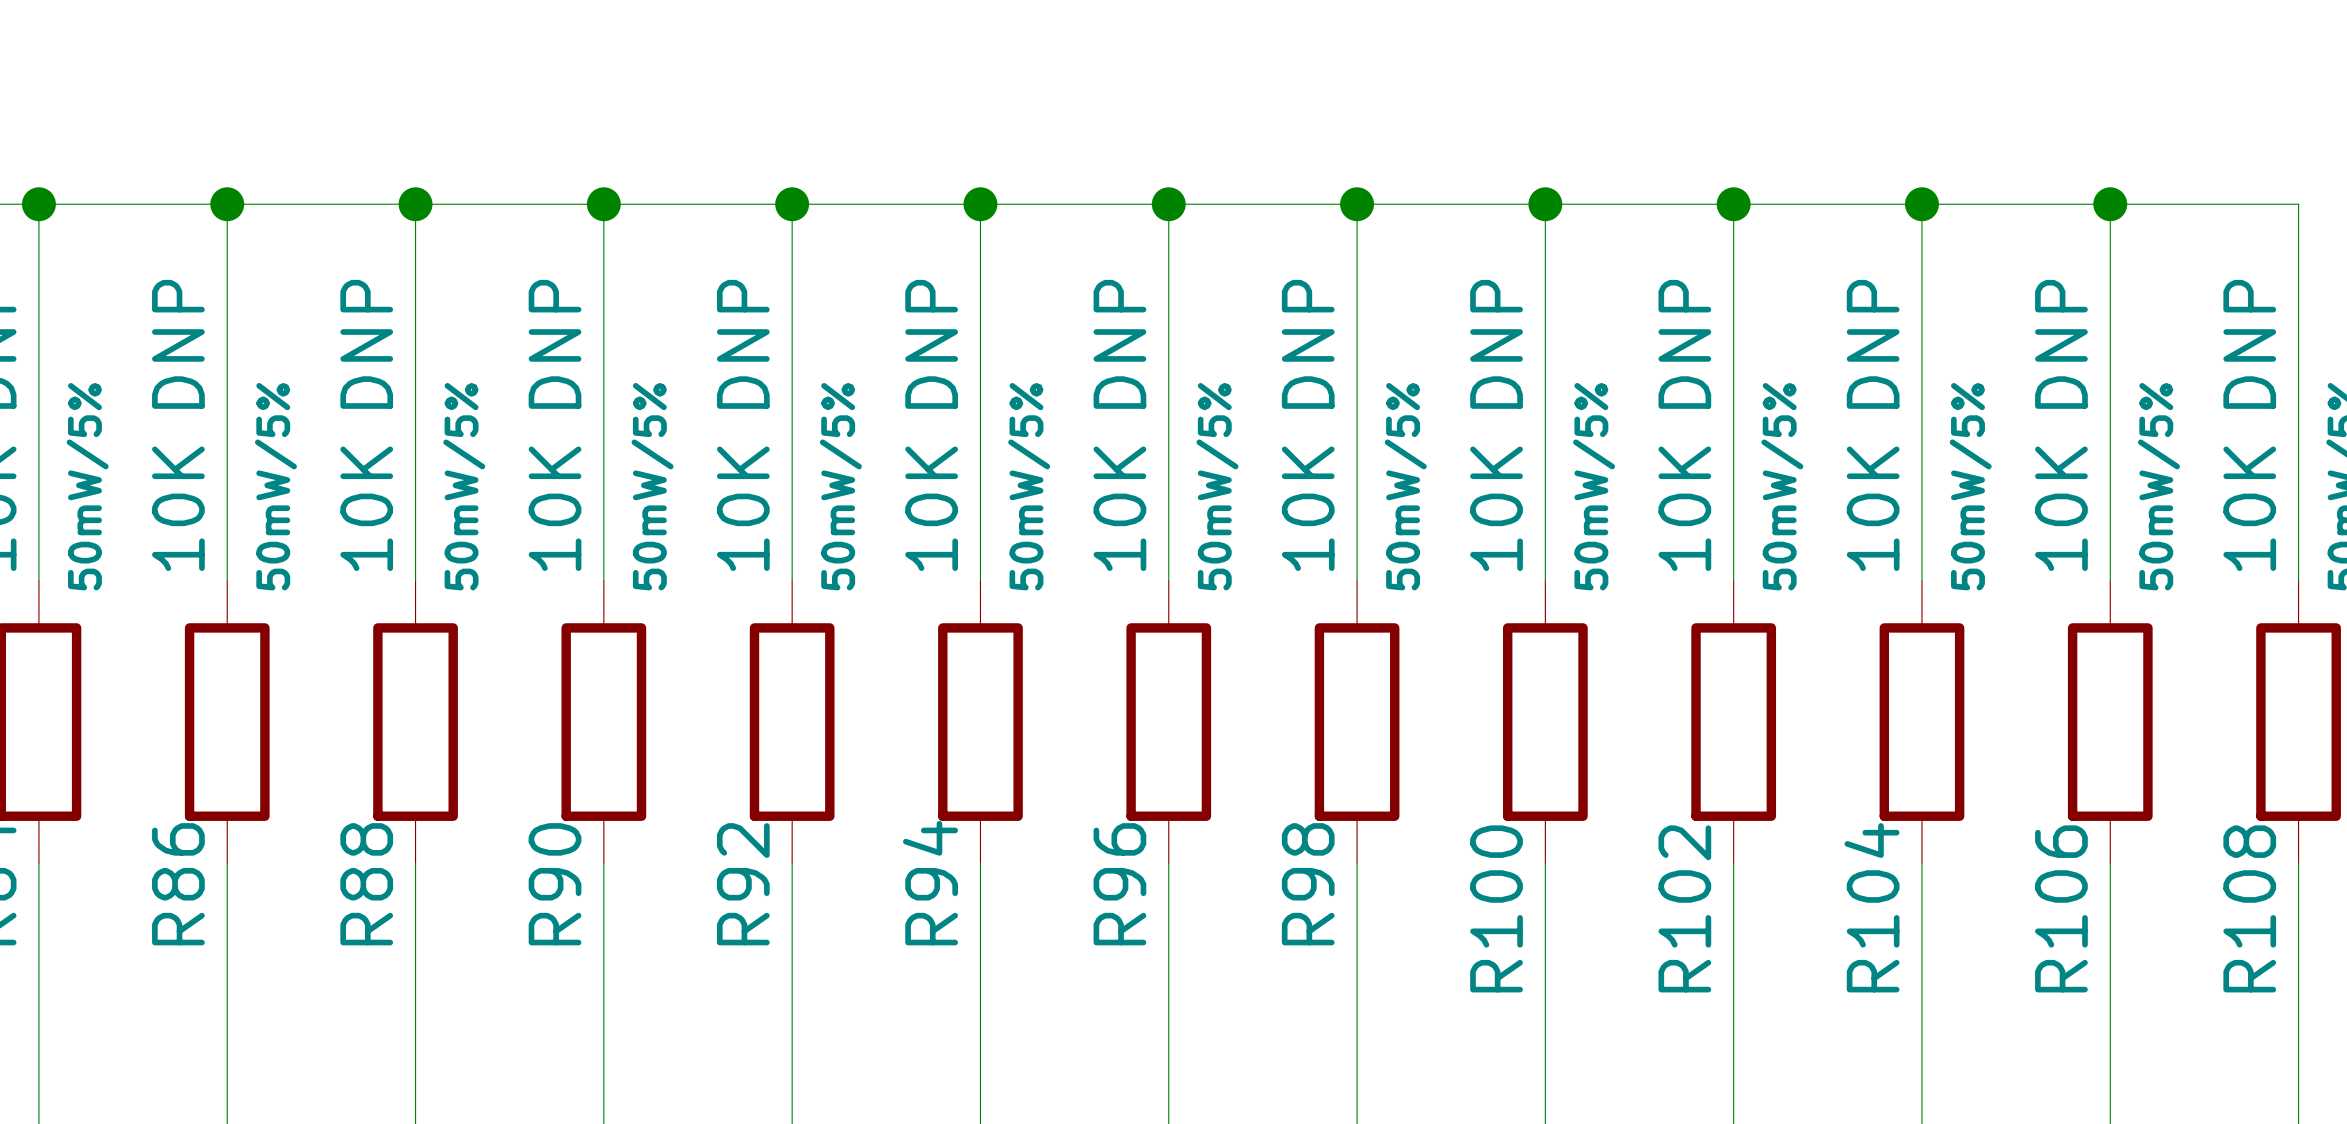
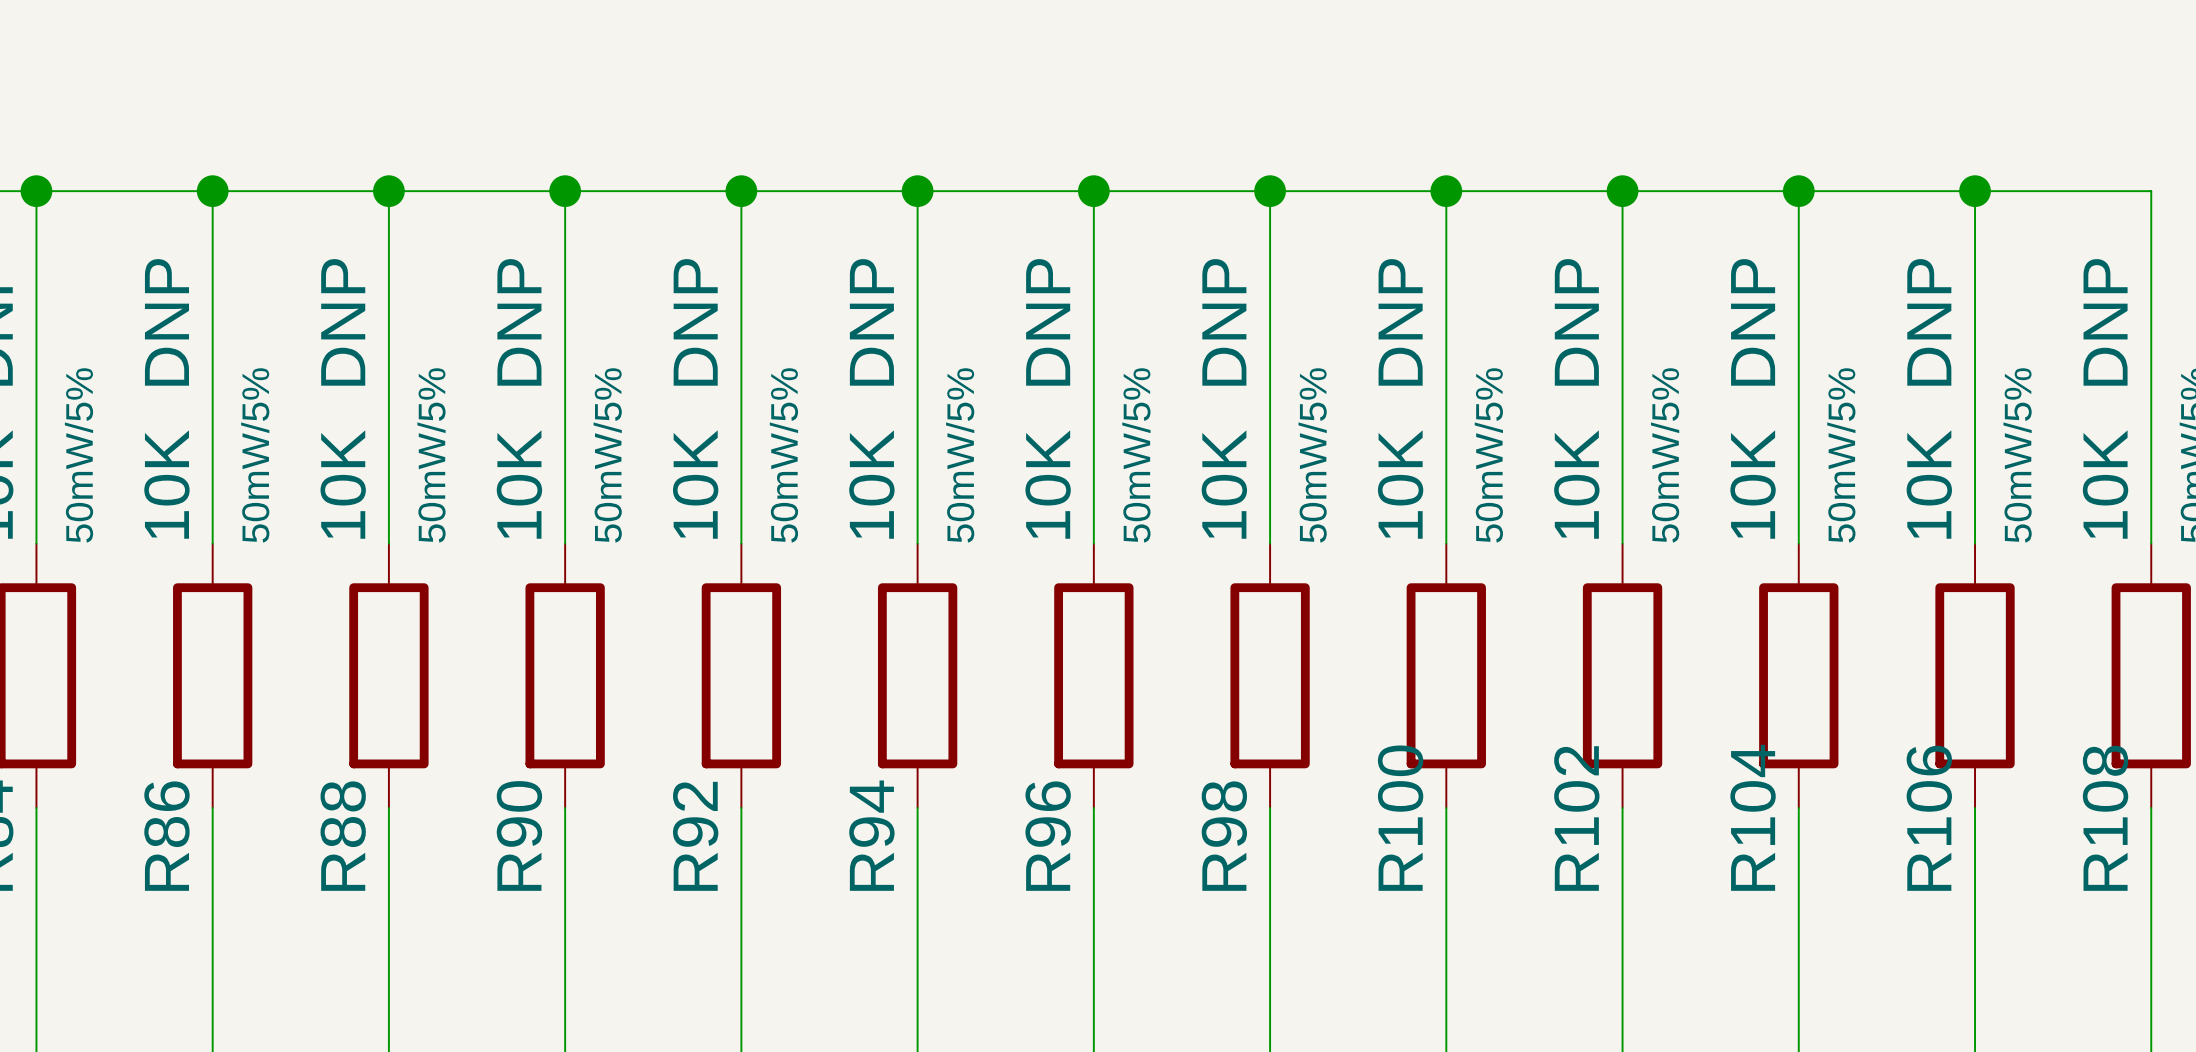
R104 name position: R104 (1872, 907) -> R104 (1753, 817)
R100 name position: R100 (1496, 908) -> R100 (1400, 818)
R102 name position: R102 (1684, 908) -> R102 (1576, 818)
R106 name position: R106 (2061, 908) -> R106 (1929, 818)
R108 name position: R108 (2249, 908) -> R108 (2105, 818)

